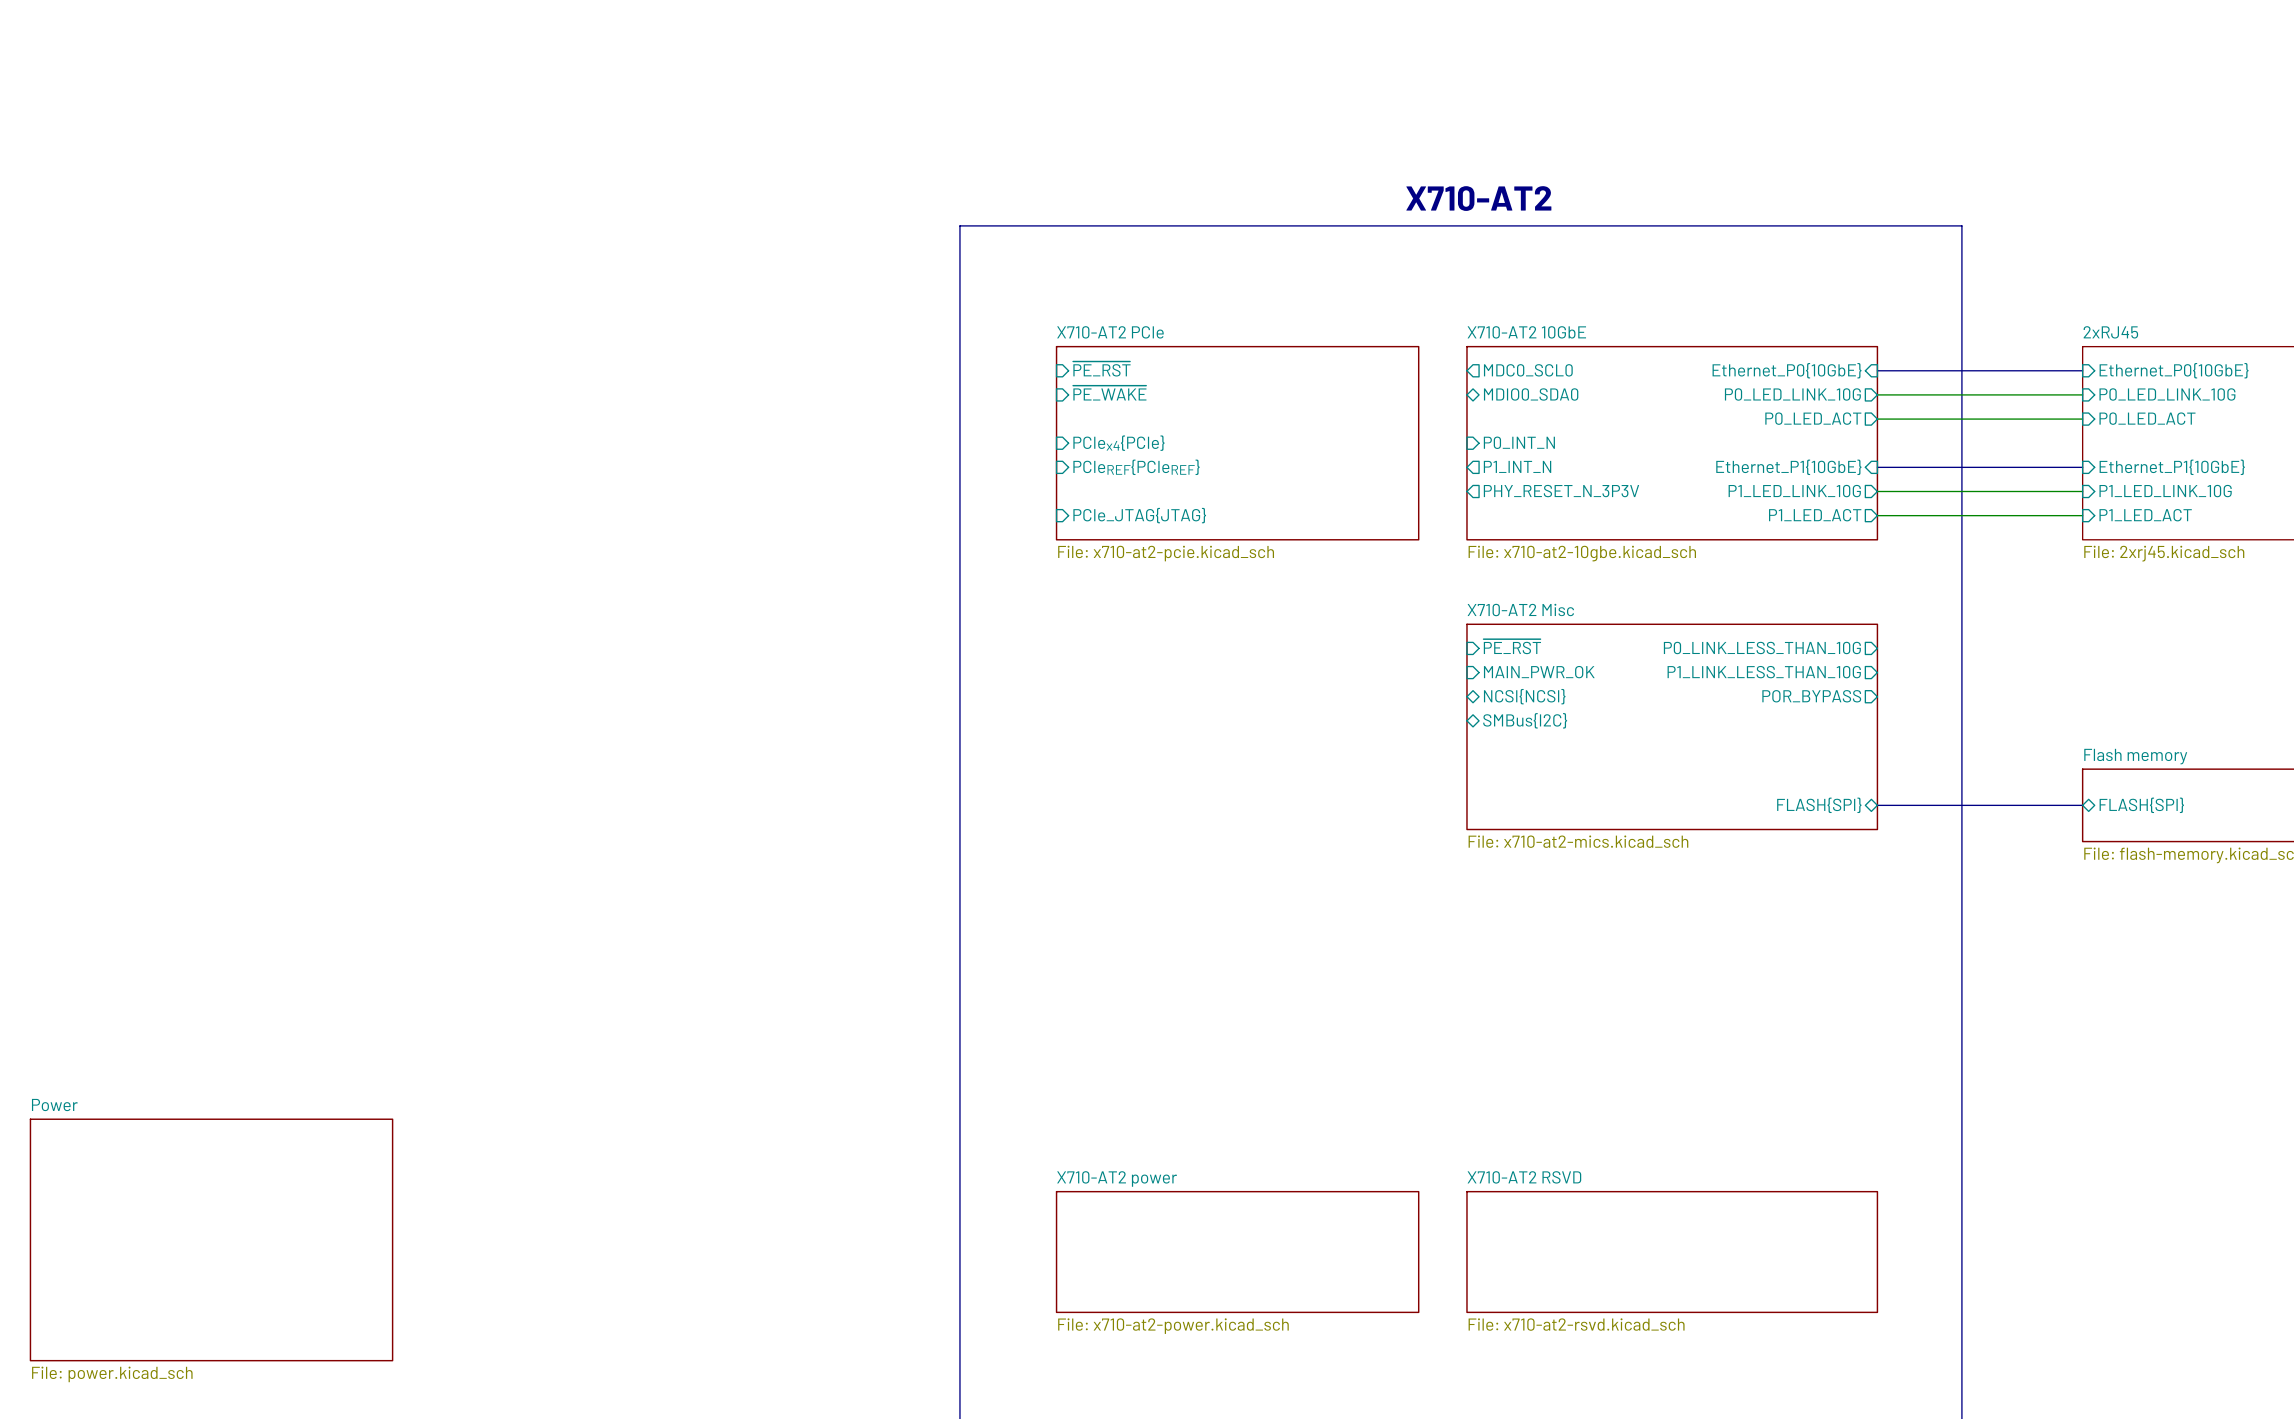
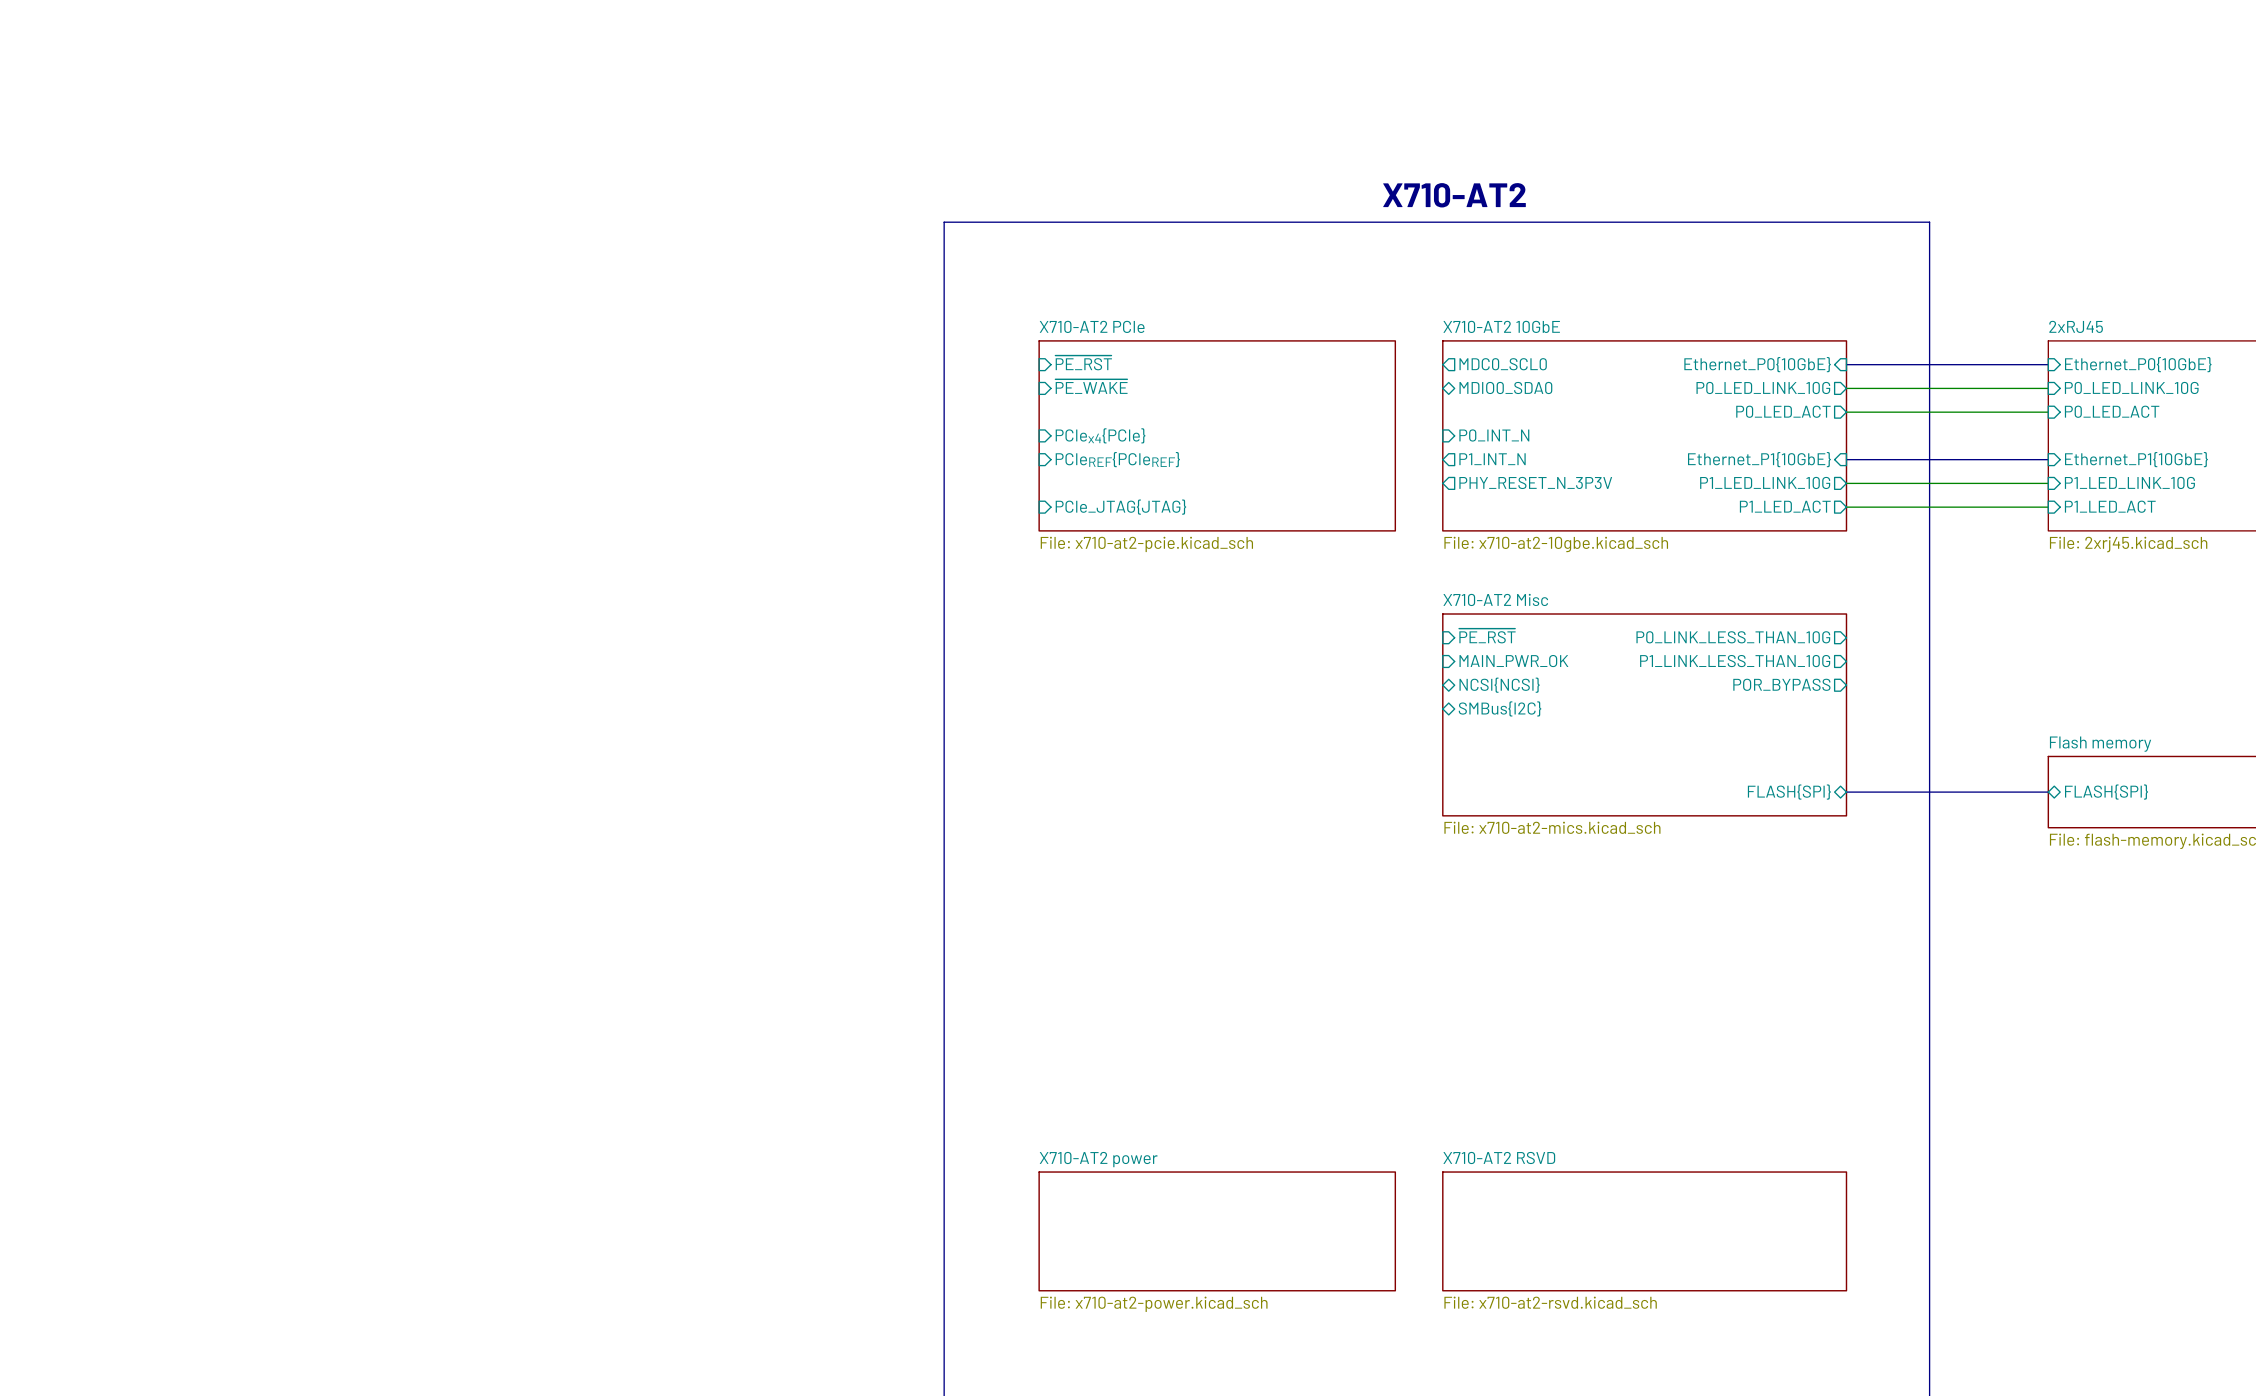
sheet Power: File: power.kicad_sch (211, 1239) -> none

